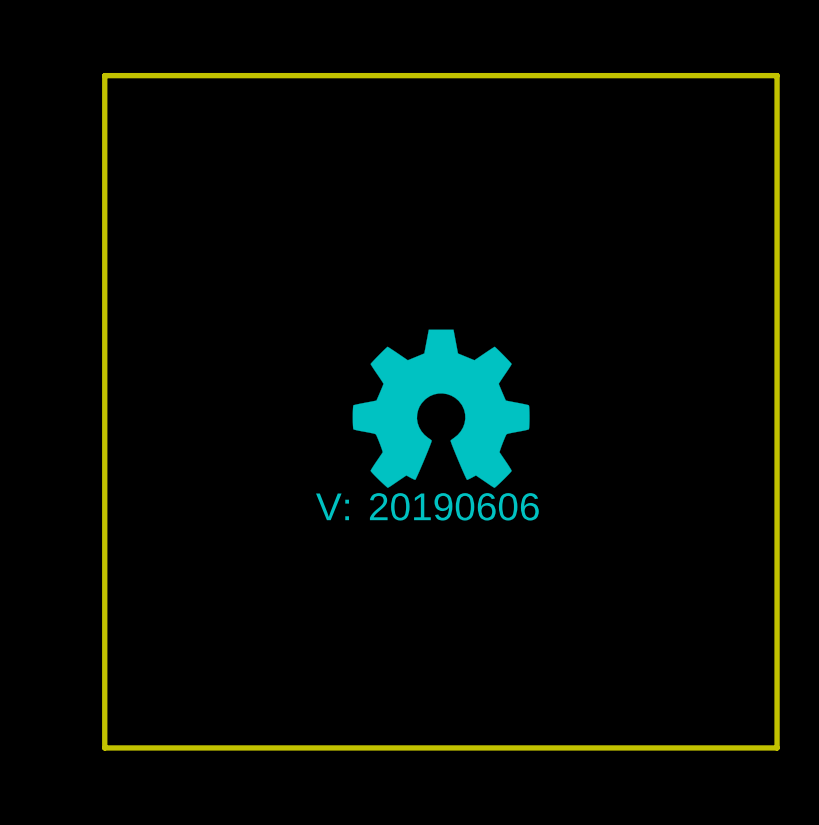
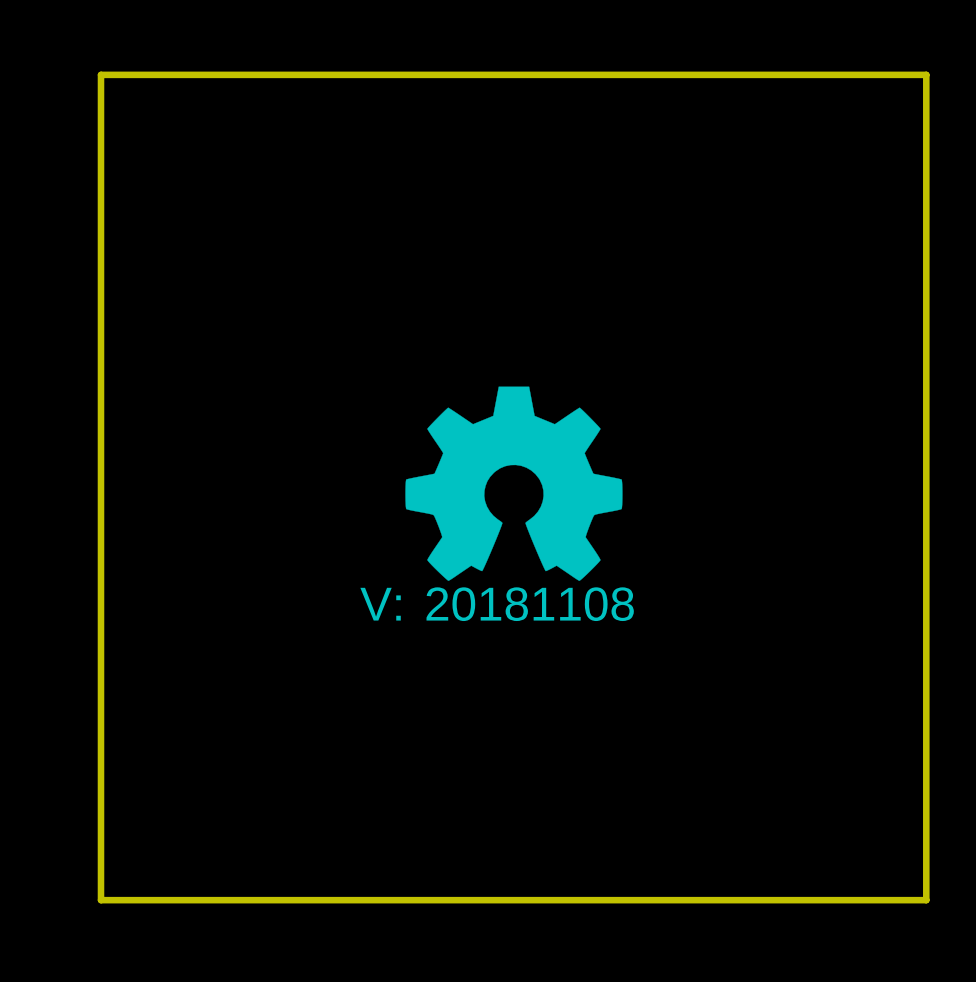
drawing shape: [316, 493, 539, 521] -> [360, 587, 634, 622]

